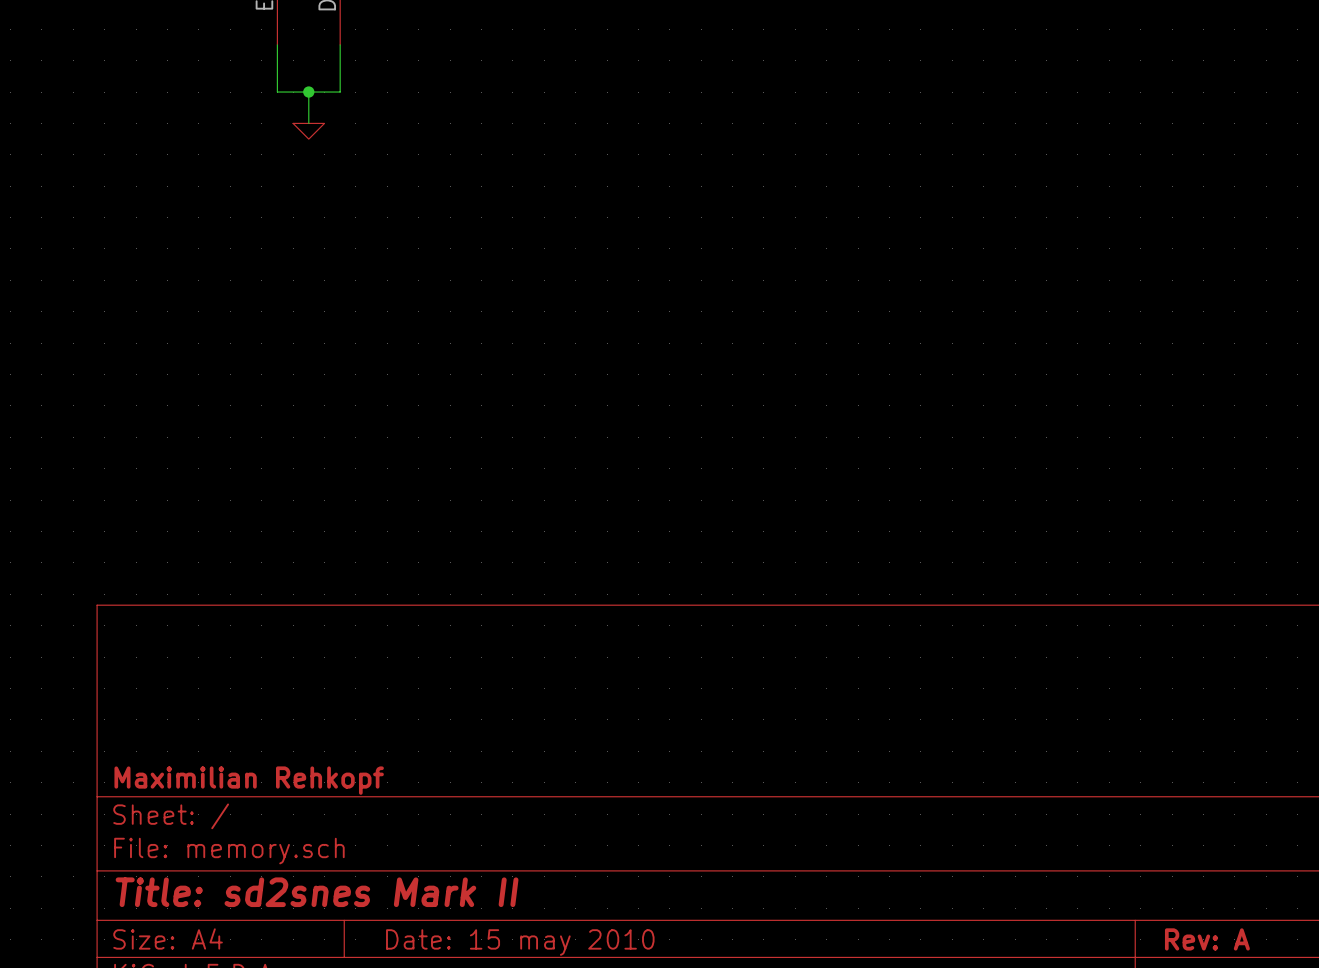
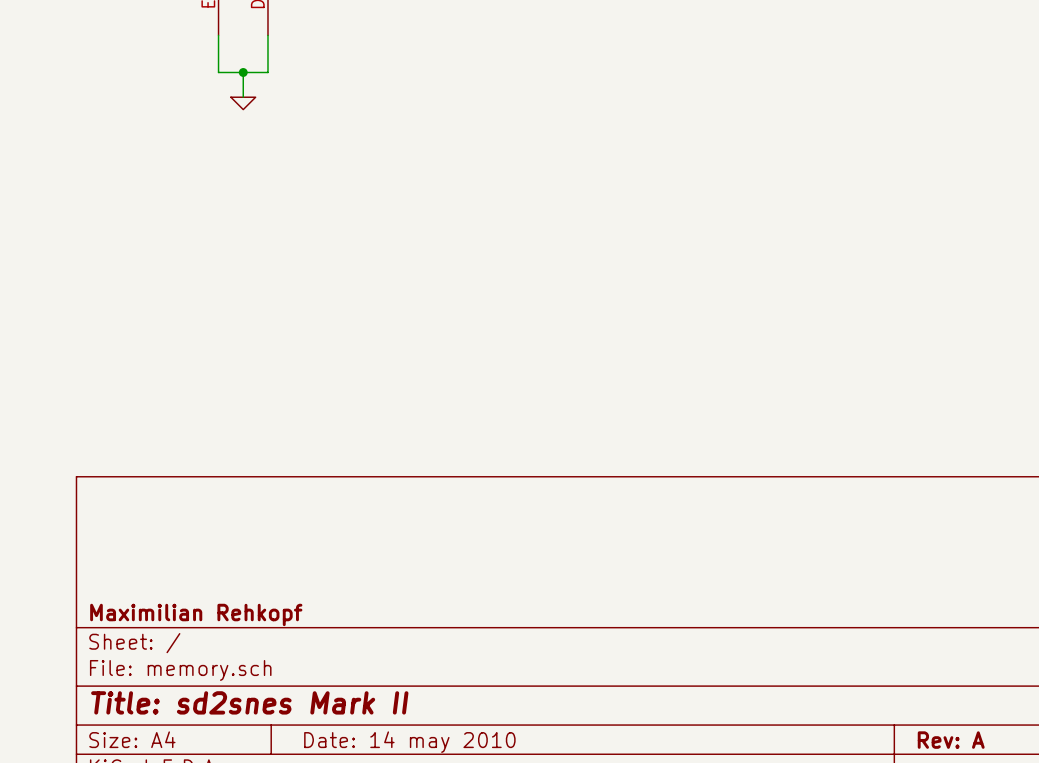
title block: Date: 15 may 2010 (520, 942) -> Date: 14 may 2010 (409, 742)

